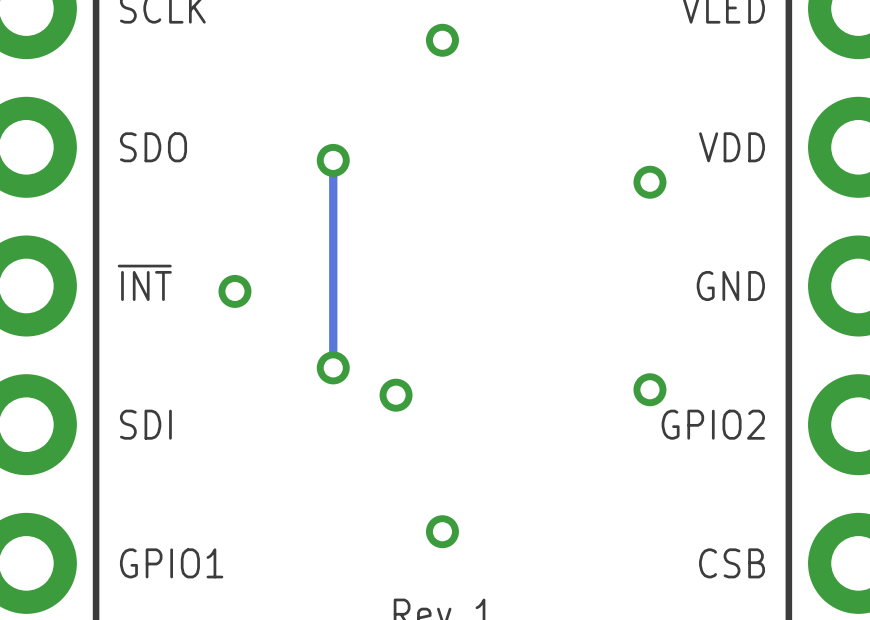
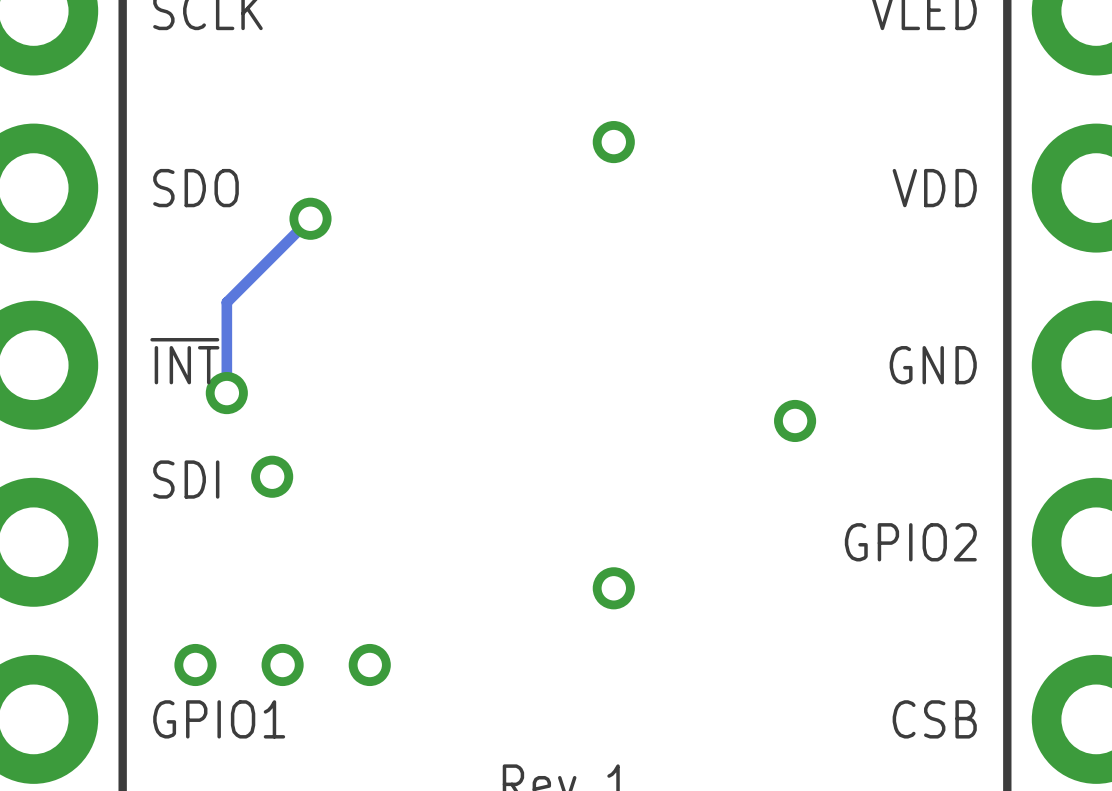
via: (442, 40) -> none
via: none -> (613, 142)
track: (333, 160) (333, 367) -> none
via: (333, 160) -> none
track: none -> (310, 218) (226, 302) (226, 393)
via: none -> (310, 218)
via: (649, 182) -> none
via: (234, 291) -> none
via: none -> (226, 393)
via: (333, 367) -> none
via: none -> (272, 476)
via position: (649, 389) -> (795, 420)
via: (396, 395) -> none
text position: SDI (145, 424) -> SDI (186, 479)
via: none -> (613, 588)
via: none -> (195, 665)
via: none -> (282, 665)
via: none -> (369, 665)
via: (442, 531) -> none

